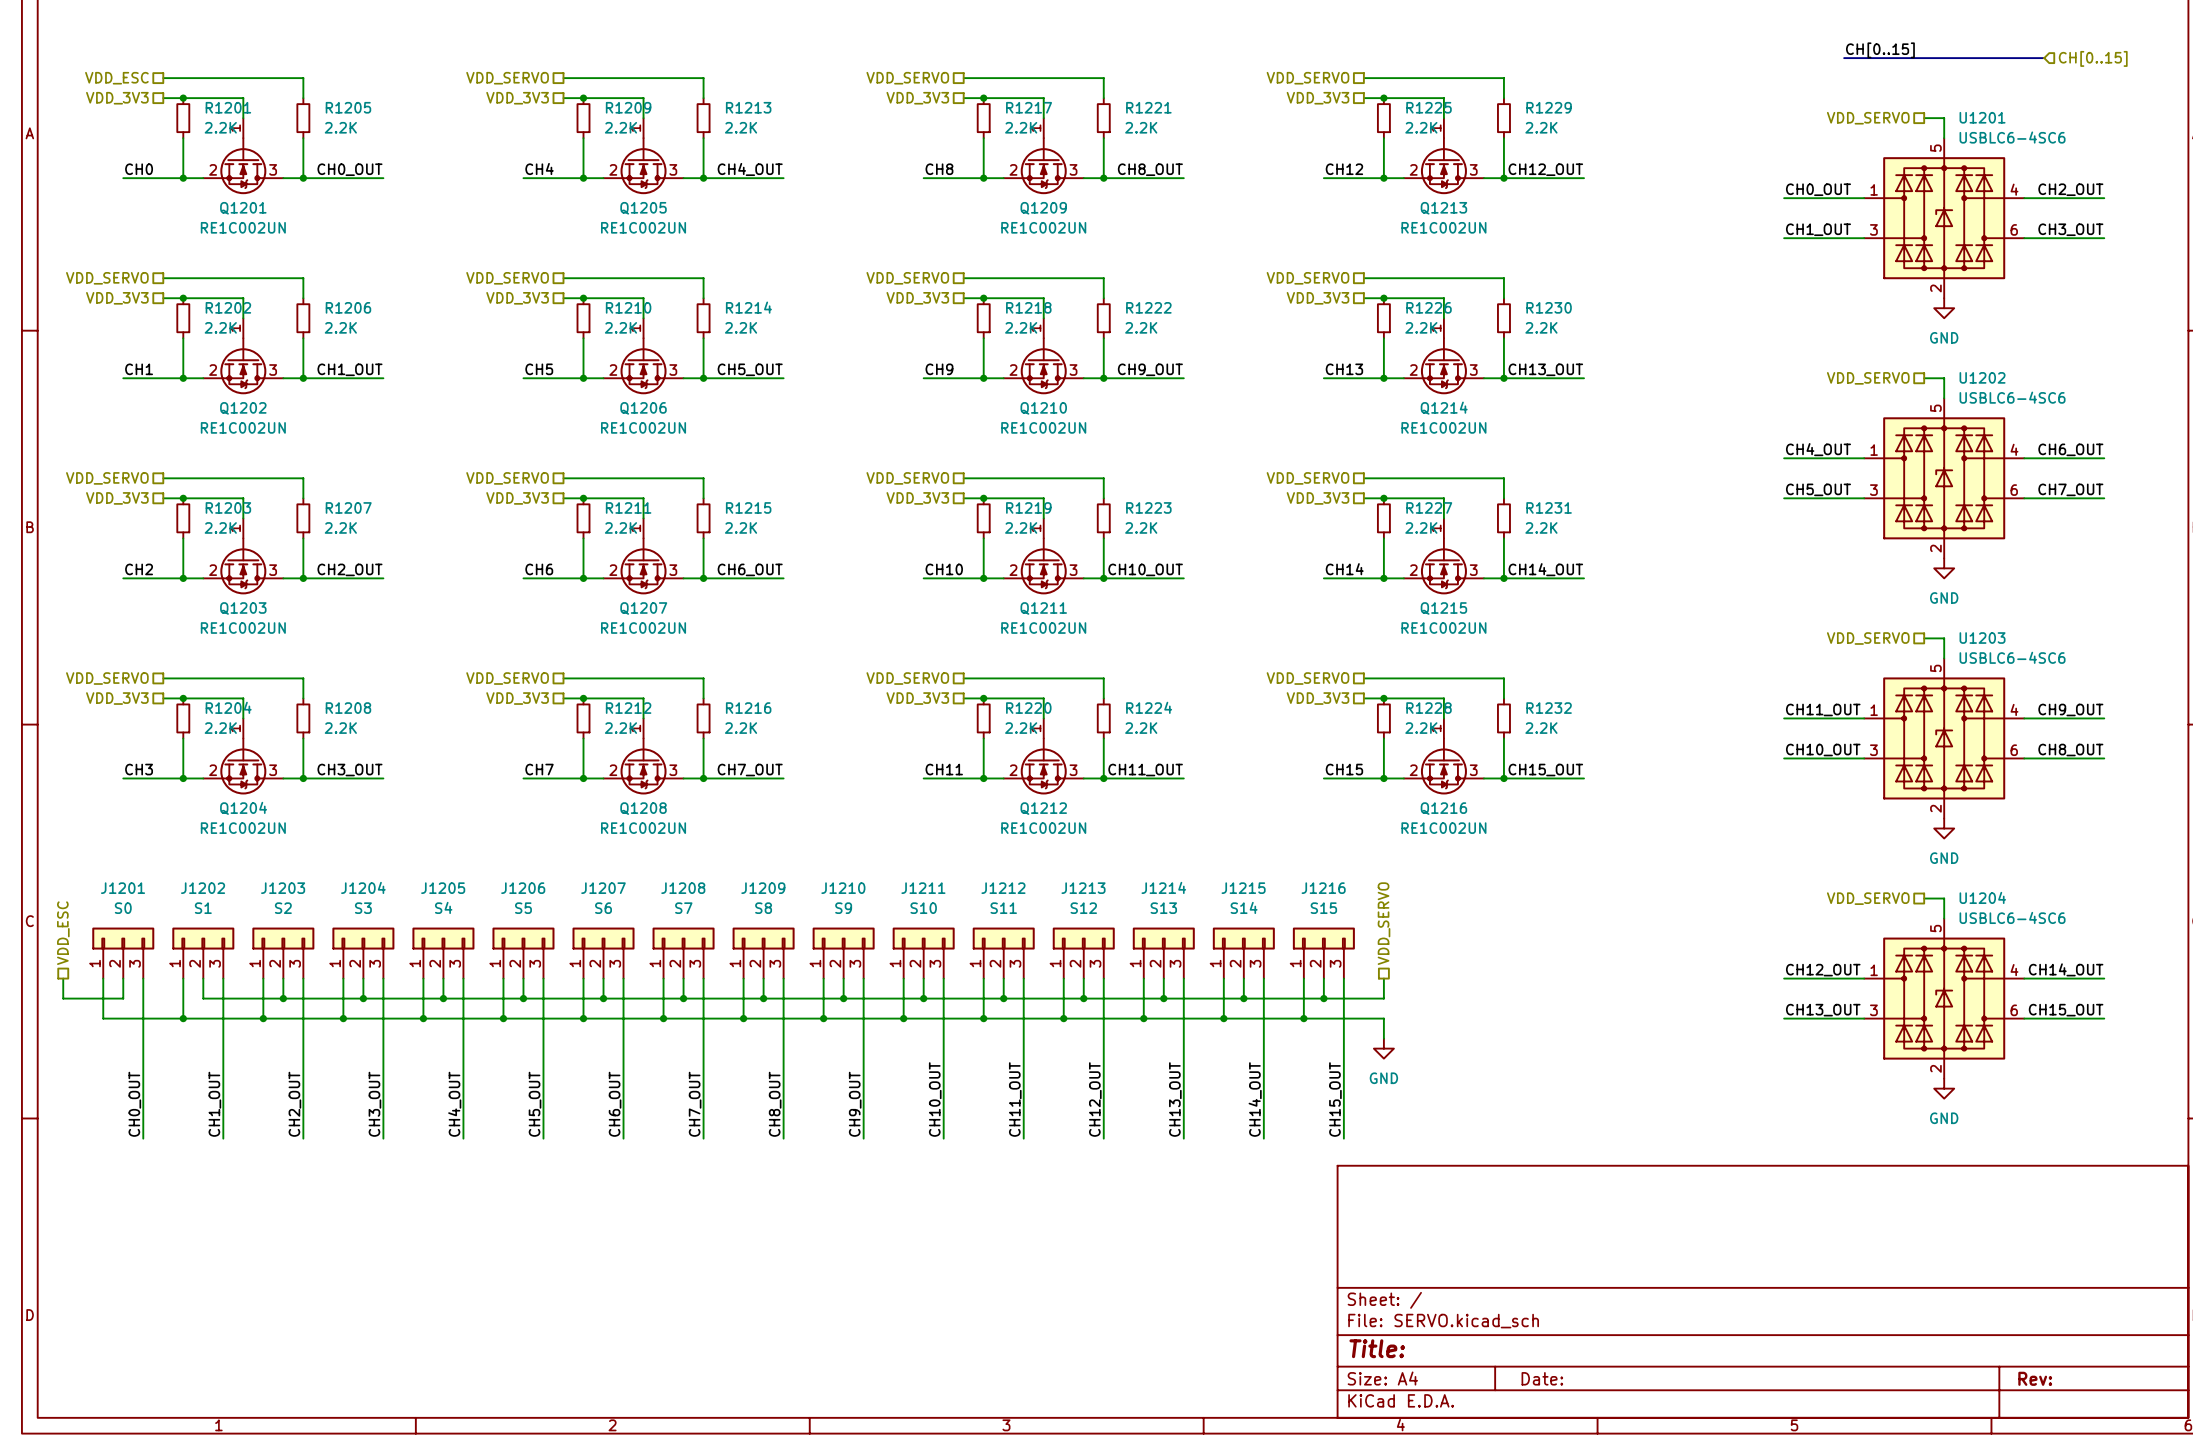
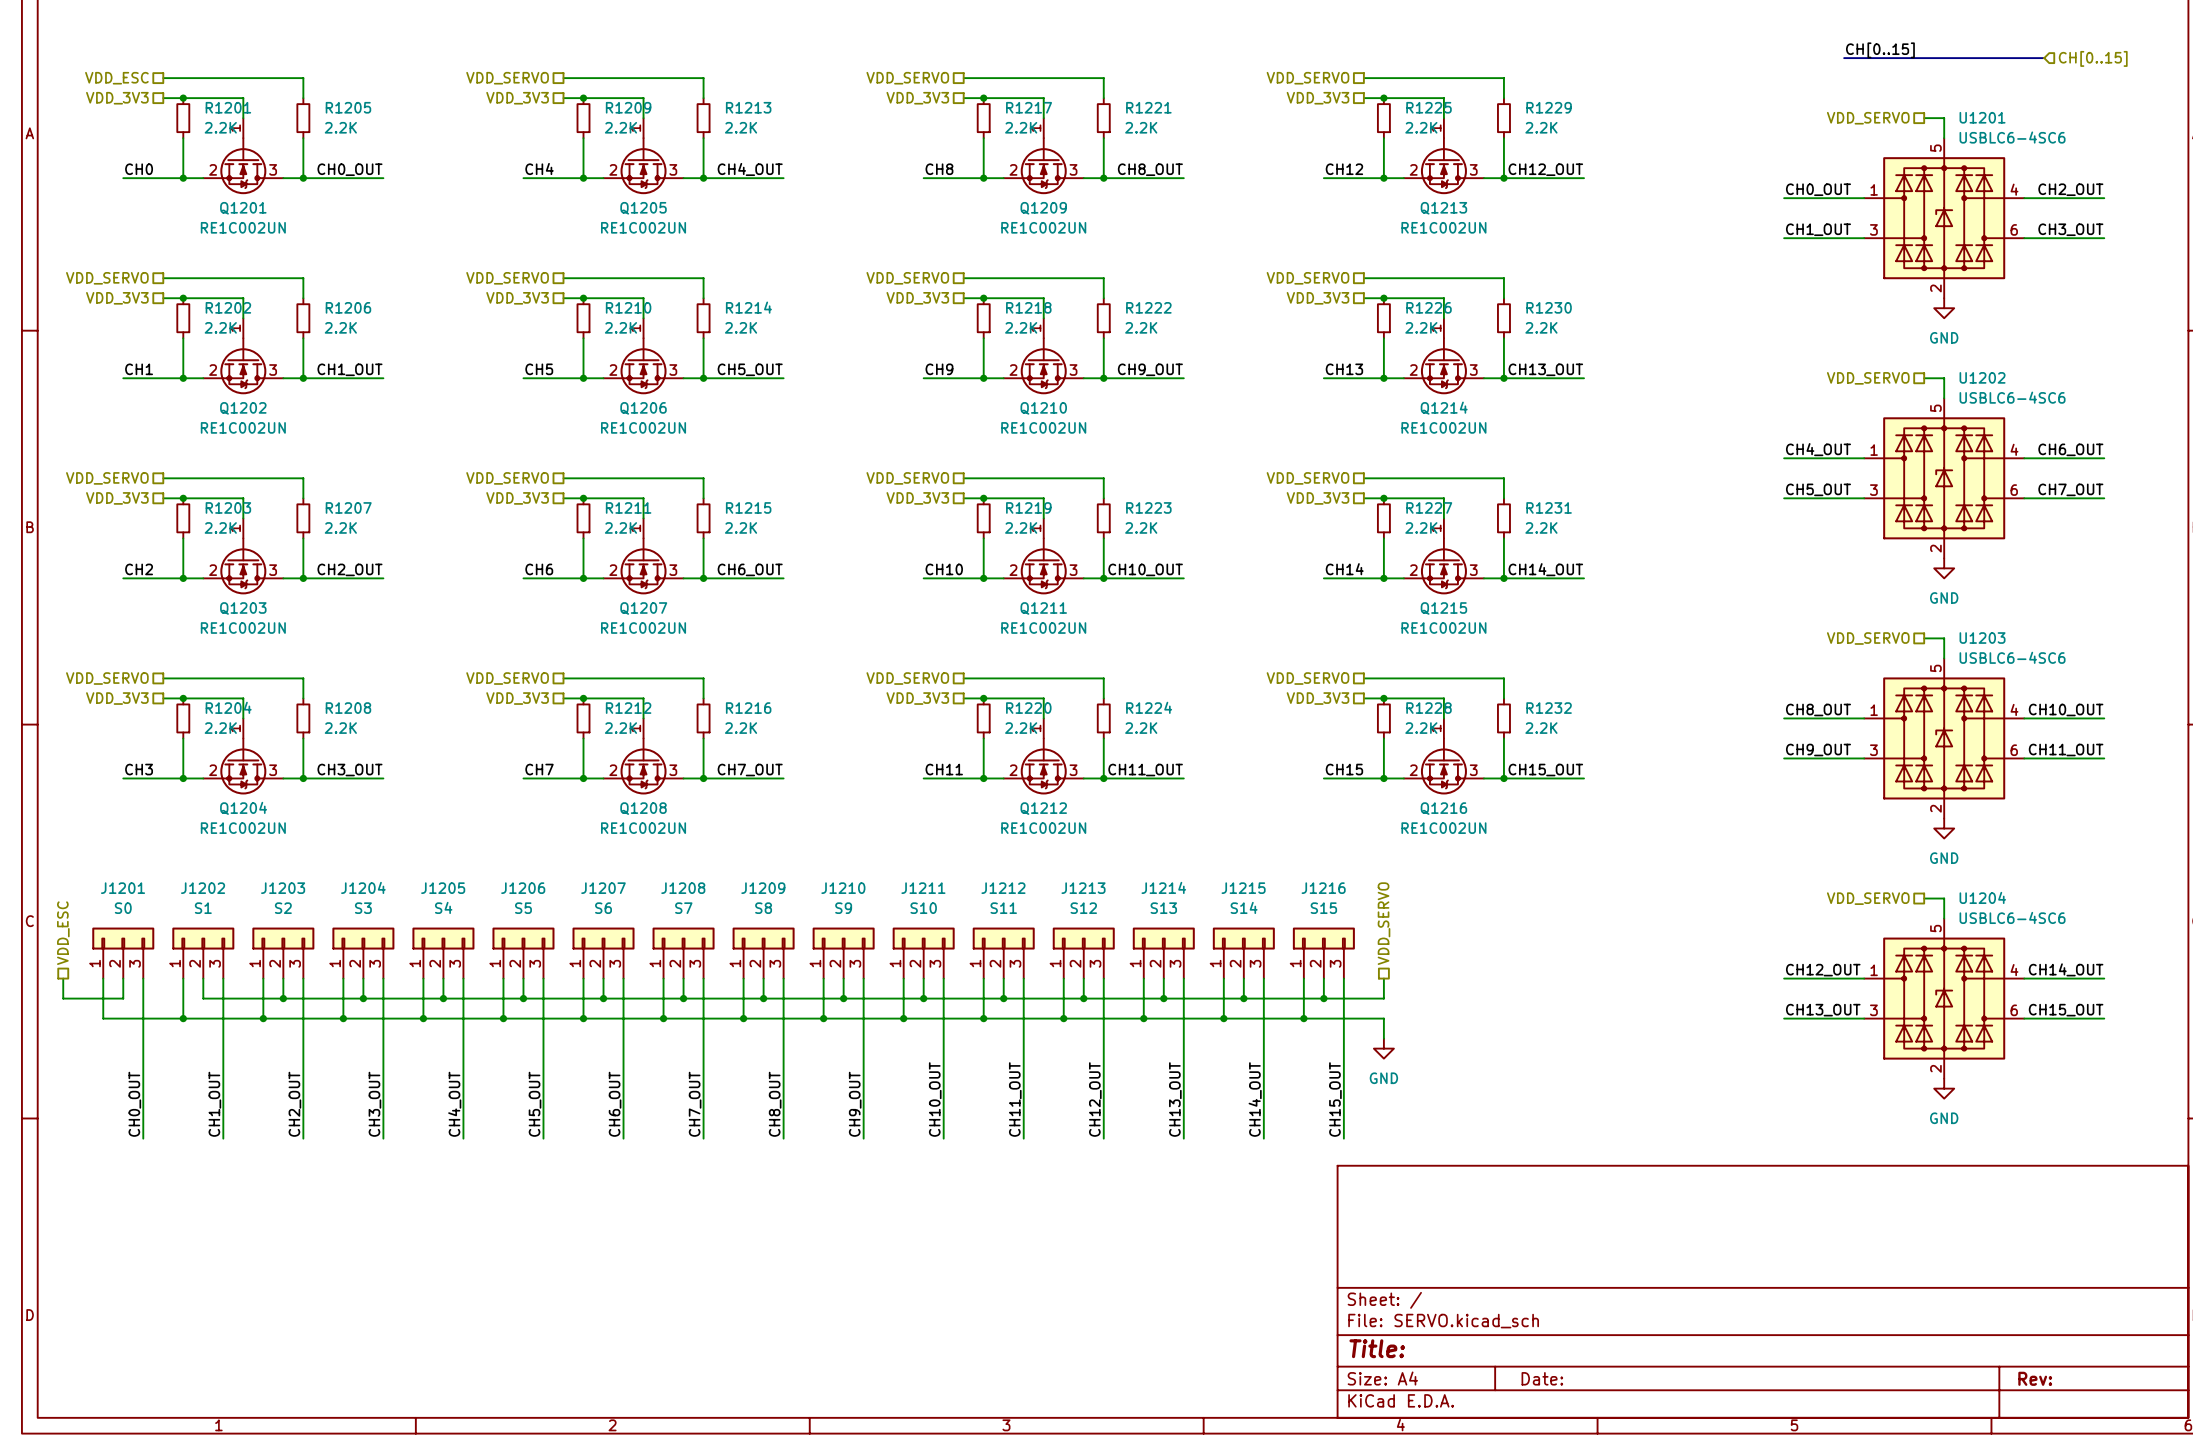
label: CH11_OUT (1823, 709) -> CH8_OUT (1818, 709)
label: CH9_OUT (2070, 709) -> CH10_OUT (2066, 709)
label: CH10_OUT (1823, 750) -> CH9_OUT (1818, 750)
label: CH8_OUT (2070, 750) -> CH11_OUT (2066, 750)

